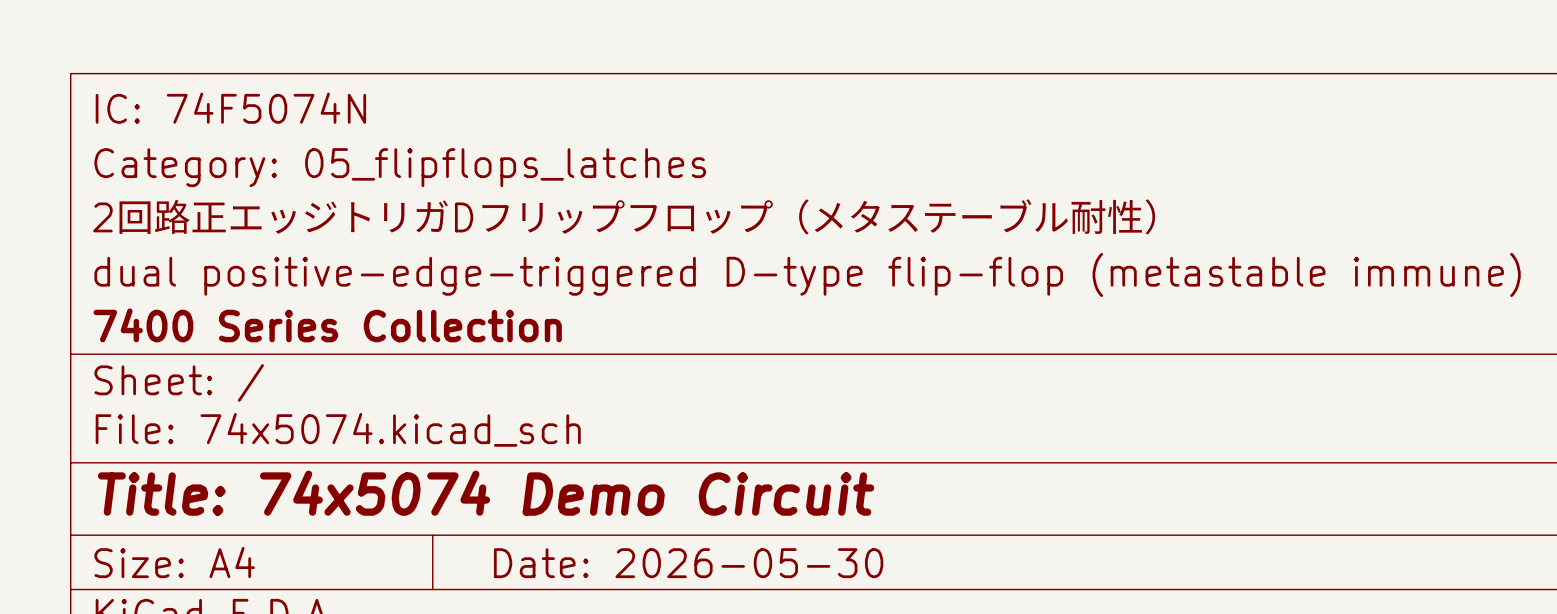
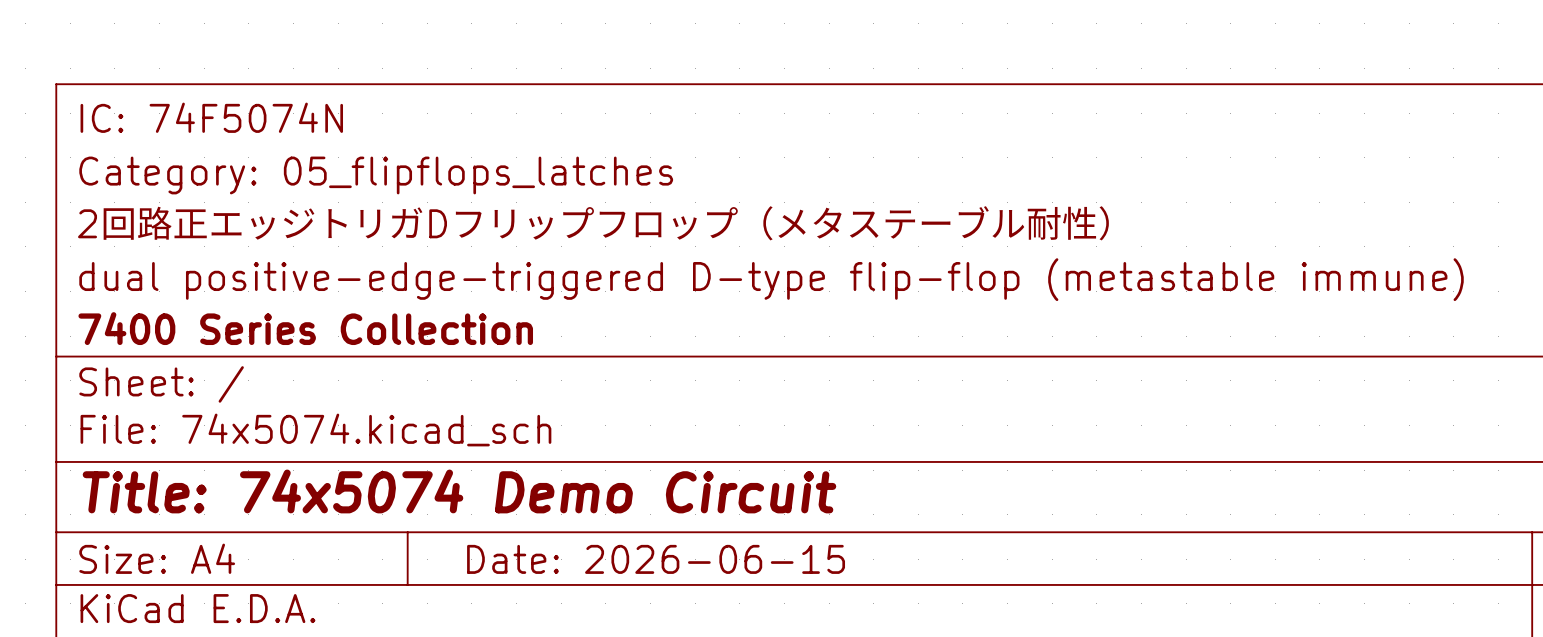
title block: Date: 2026-05-30 (688, 563) -> Date: 2026-06-15 (656, 559)

